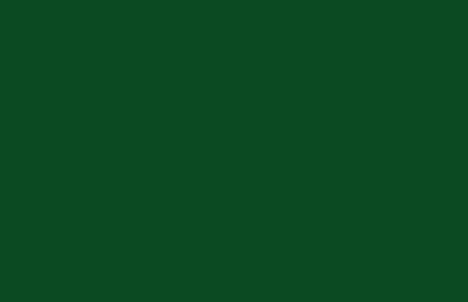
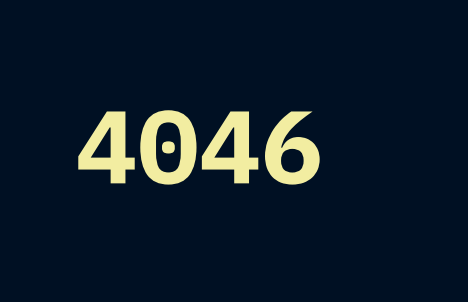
text: none -> 4046 (198, 147)

